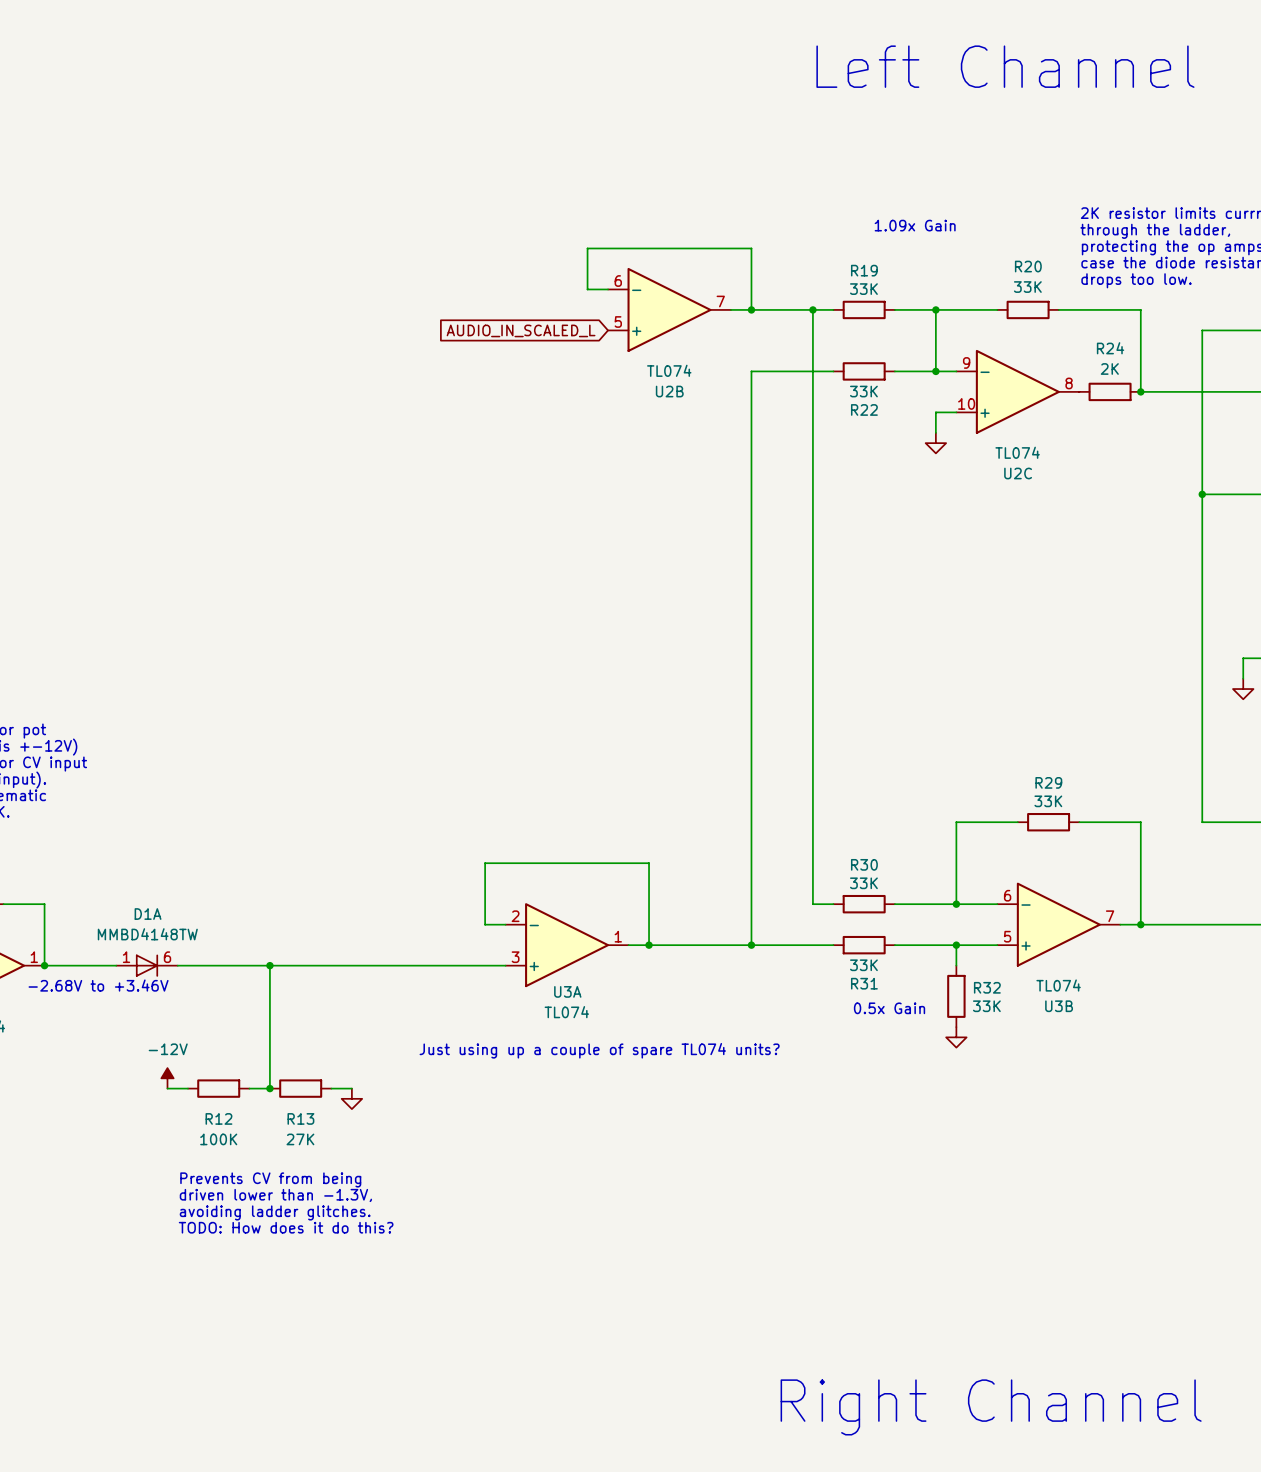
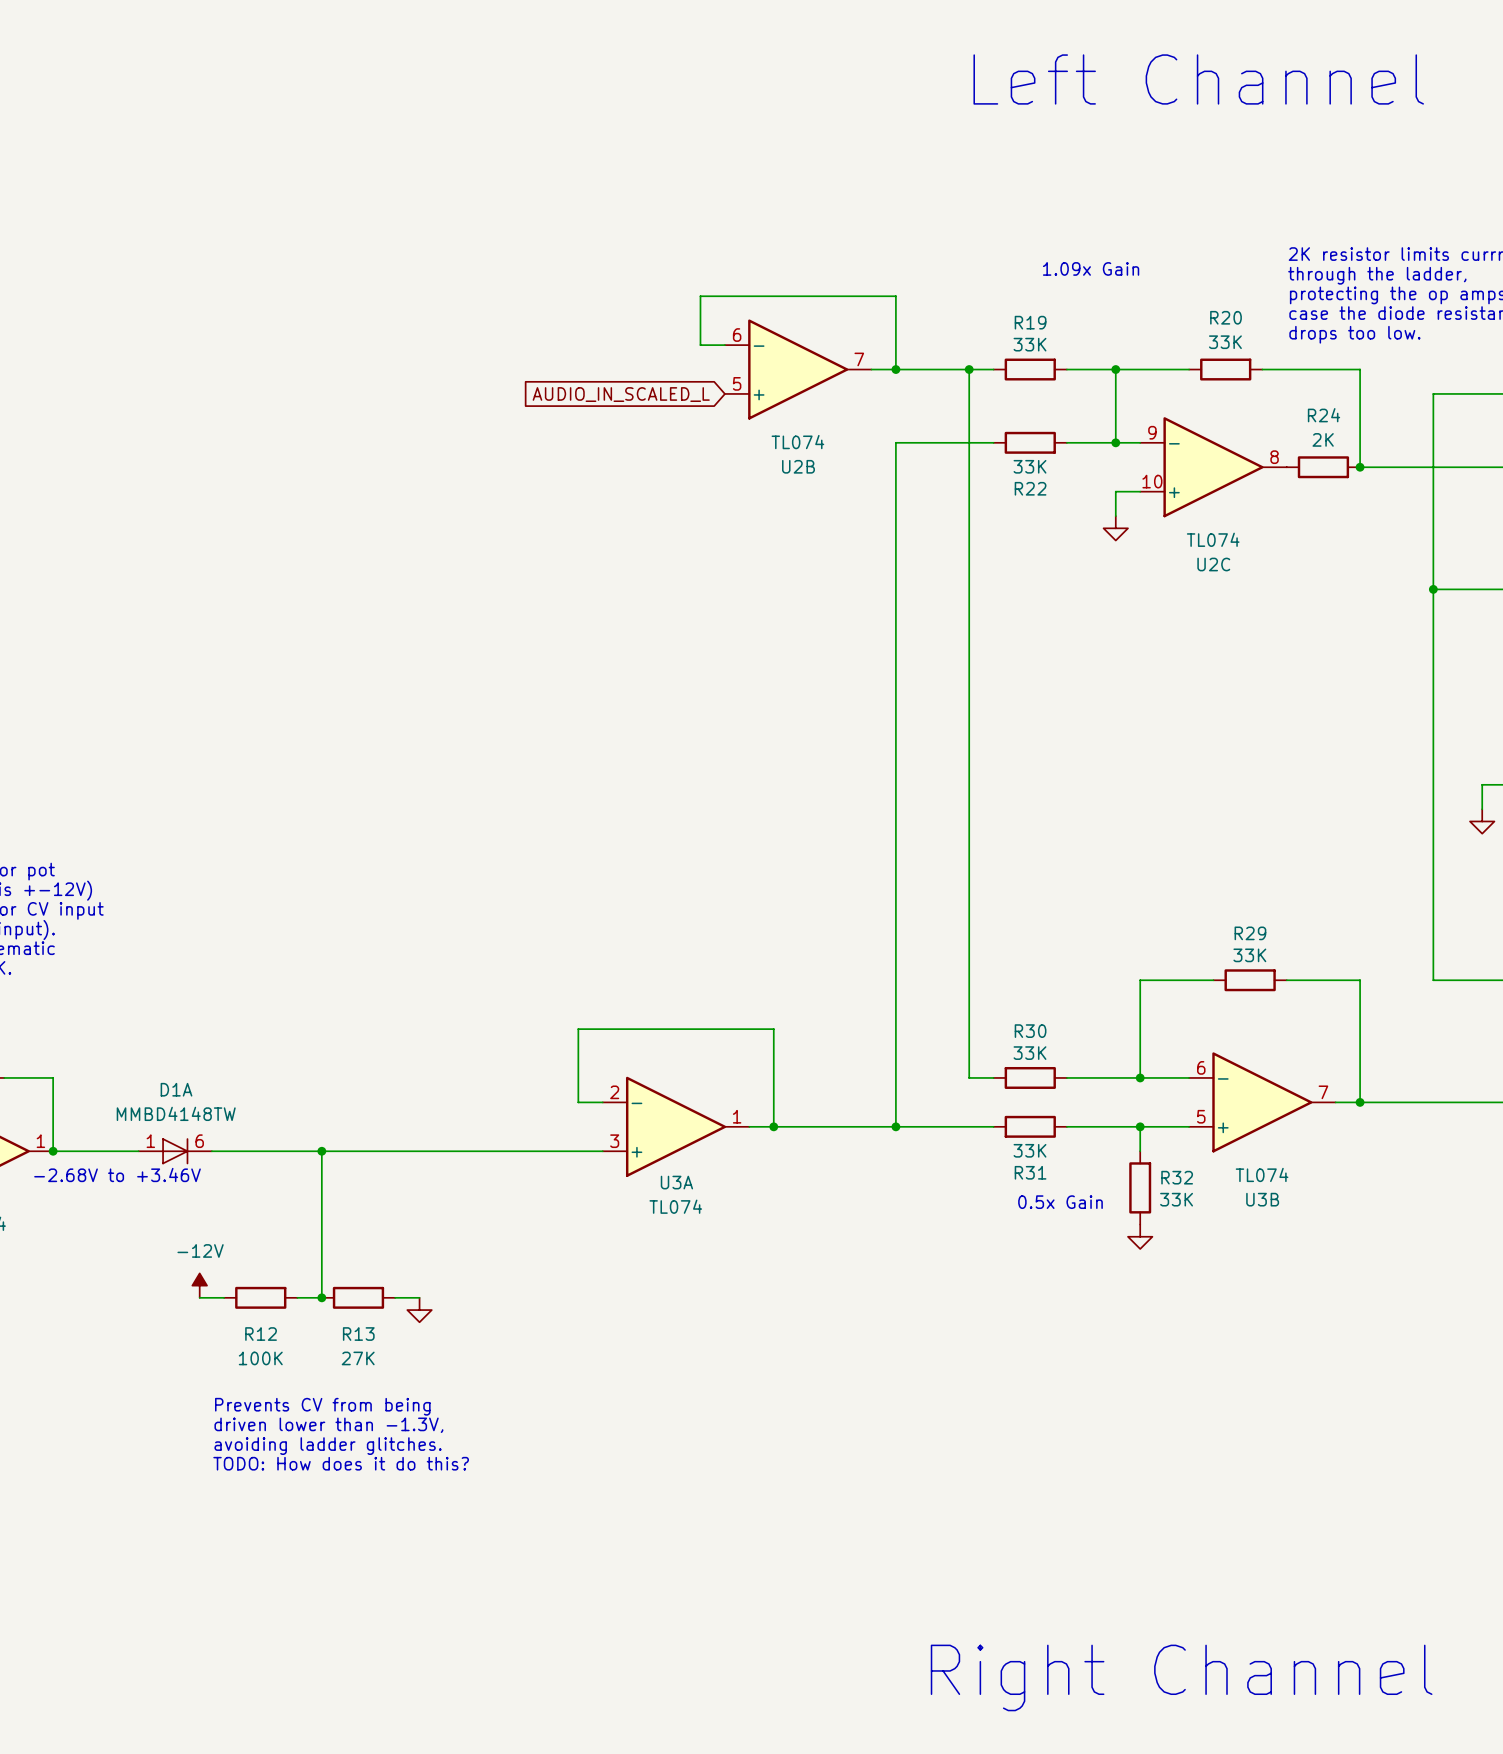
text: Just using up a couple of spare TL074 units? (599, 1050) -> none

